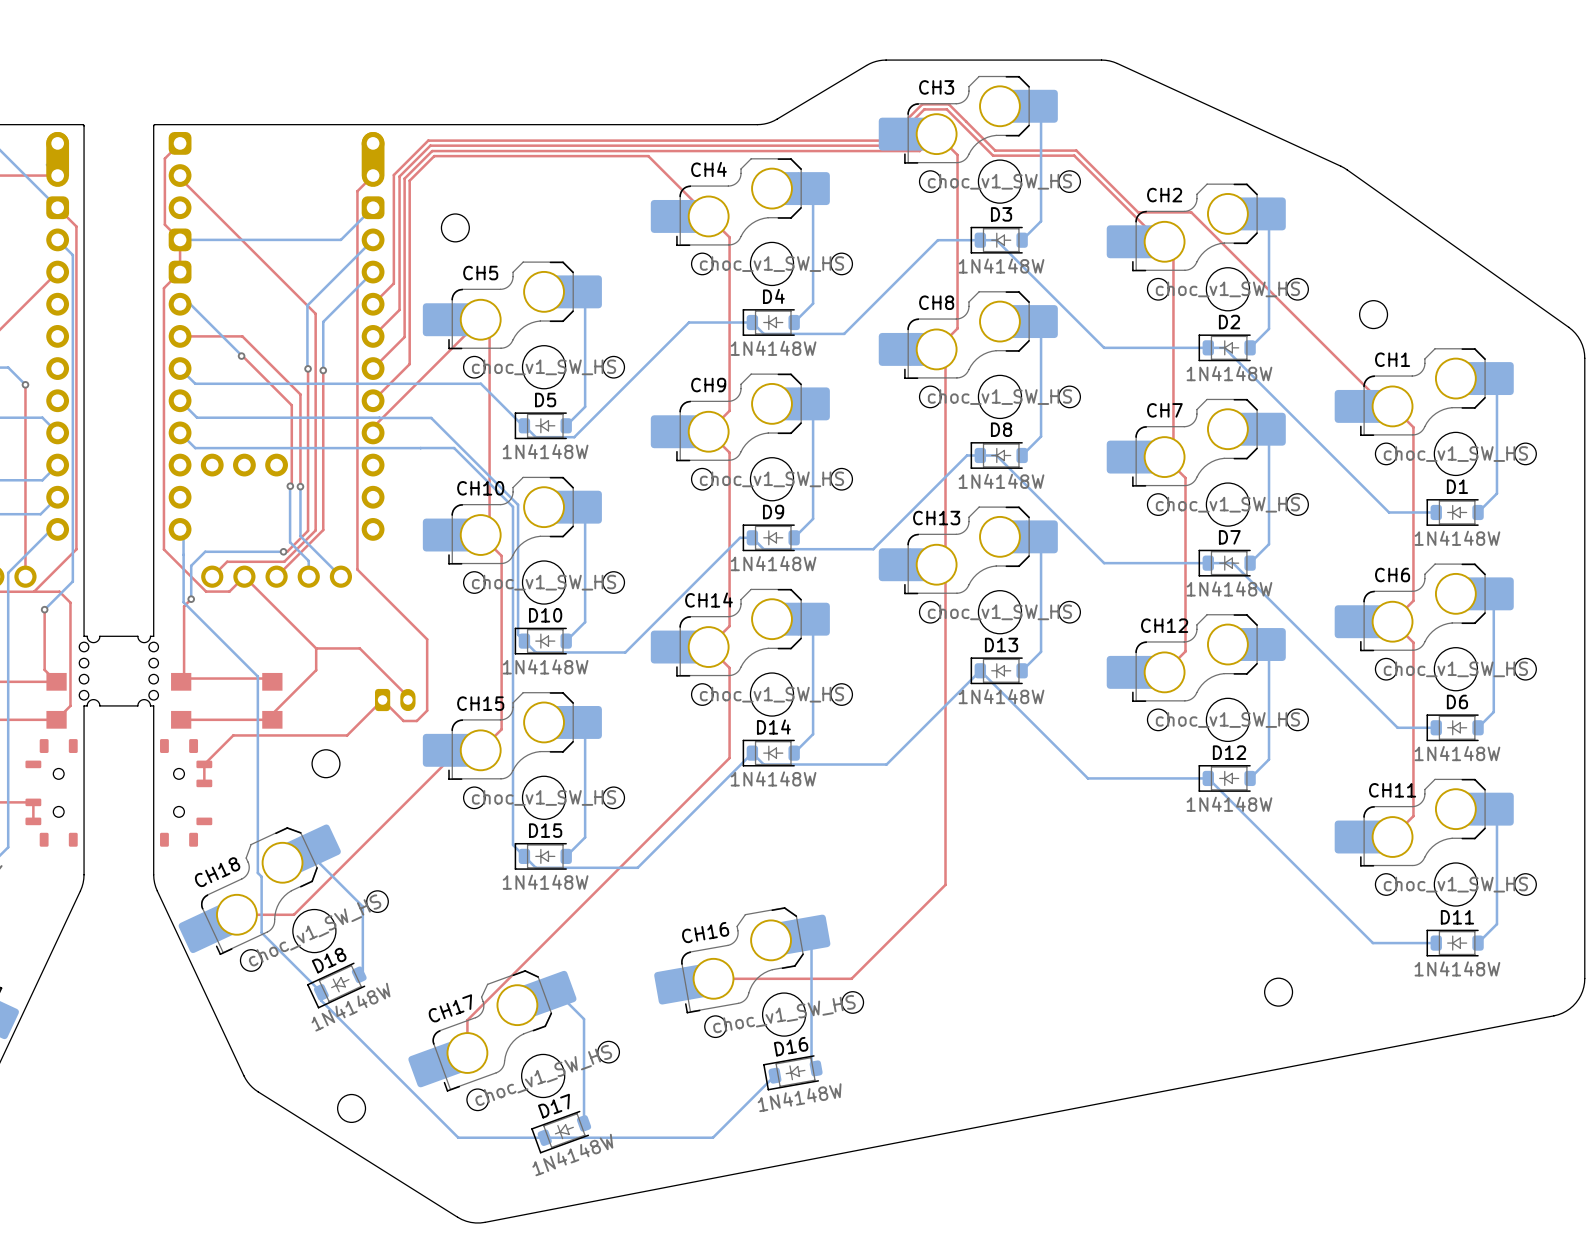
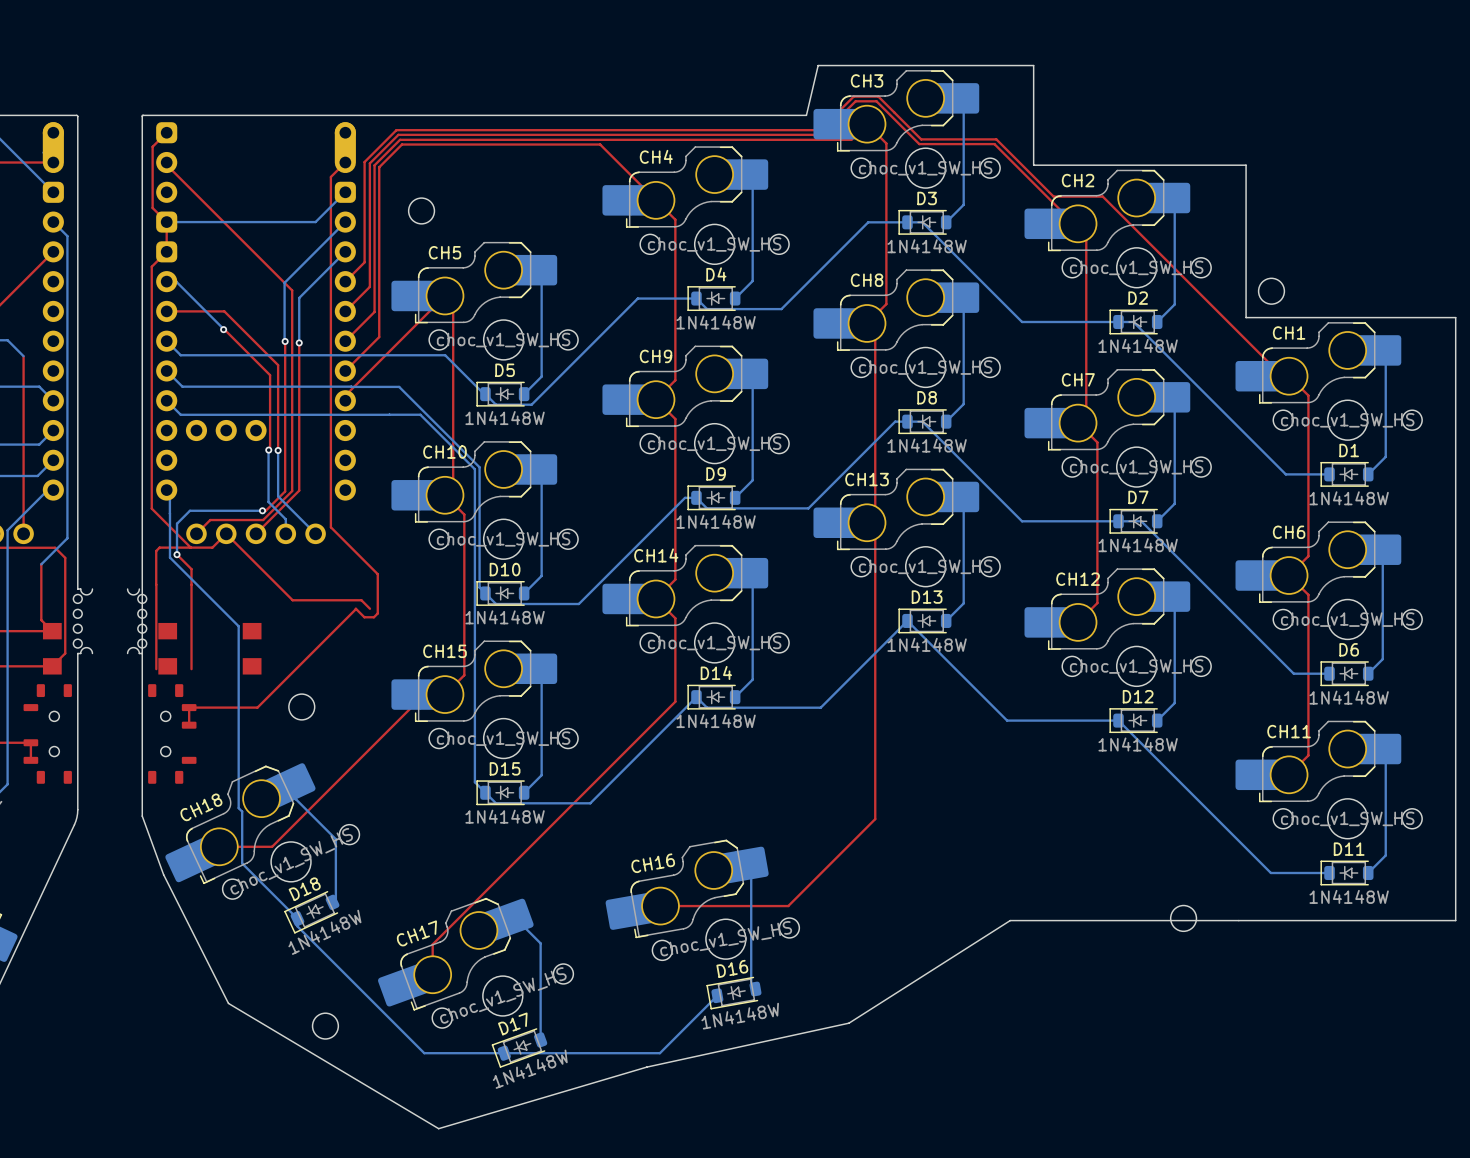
board edge: (757, 124) (773, 120) (866, 65) (879, 60) (1109, 60) (1344, 167) (1575, 333) (1582, 345) (1584, 358) (1584, 978) (1582, 991) (1576, 1002) (1566, 1011) (1554, 1015) (475, 1222) (457, 1217) (249, 1084) (157, 890) (153, 874) -> (701, 115) (806, 115) (818, 65) (1033, 65) (1033, 165) (1246, 165) (1246, 317) (1455, 317) (1455, 920) (1010, 920) (849, 1023) (646, 1067) (438, 1128) (228, 1003) (163, 874) (142, 816) (142, 809)
top track: (57, 207) (76, 226) (76, 549) (34, 591) -> none
via: (25, 384) -> none
top track: none -> (190, 547) (159, 547) (156, 551) (156, 584)
top track: (191, 599) (184, 606) (184, 678) -> (177, 554) (191, 569) (191, 669)
via: (44, 609) -> none
top track: (408, 620) (427, 639) (427, 710) (416, 720) (403, 720) (382, 700) (347, 735) (233, 735) (204, 764) -> (377, 574) (377, 613) (373, 617) (364, 617) (355, 608) (257, 707) (189, 707)
top track: none -> (156, 584) (156, 669)
board edge: (137, 636) (99, 636) -> none
board edge: (153, 636) (150, 636) -> (142, 589) (142, 653)
top track: (316, 648) (316, 670) (272, 714) (272, 719) (181, 719) -> none
top track: (359, 648) (407, 696) (407, 700) -> (333, 600) (361, 600) (369, 608)
top track: (265, 678) (184, 678) (181, 681) -> none
part: (395, 700) -> none
board edge: (137, 705) (99, 705) -> none

